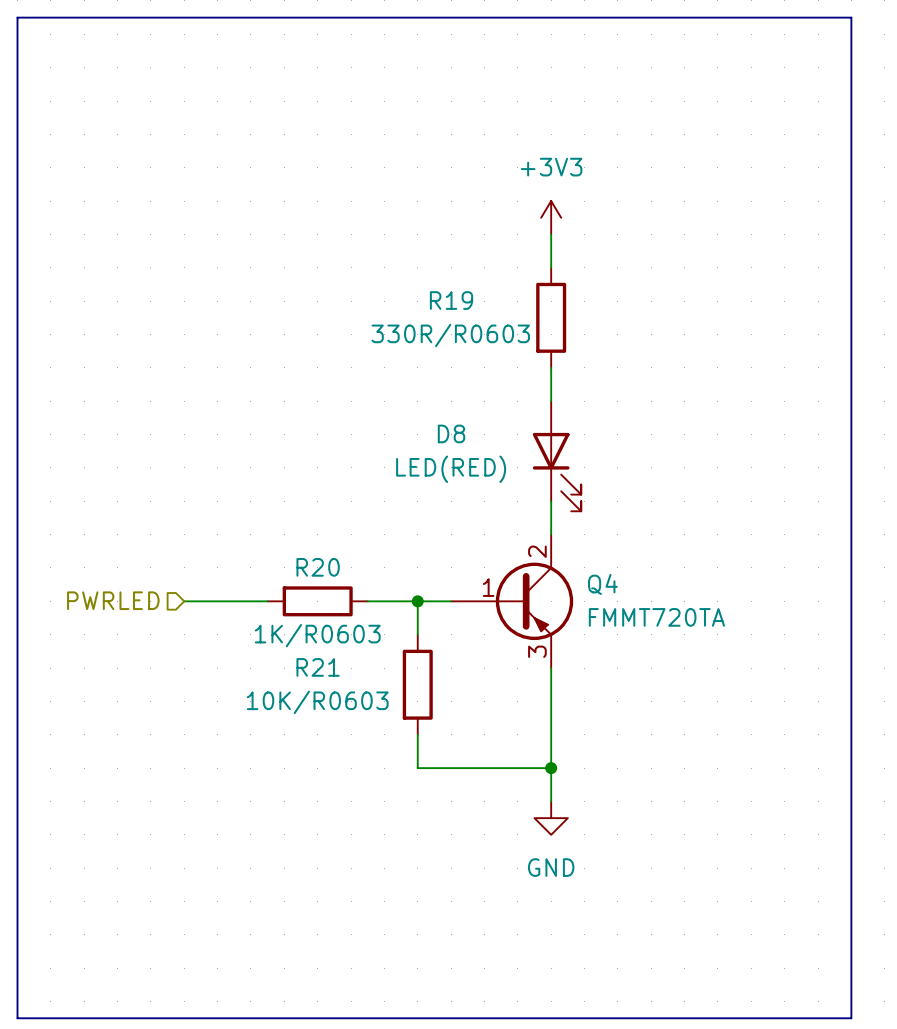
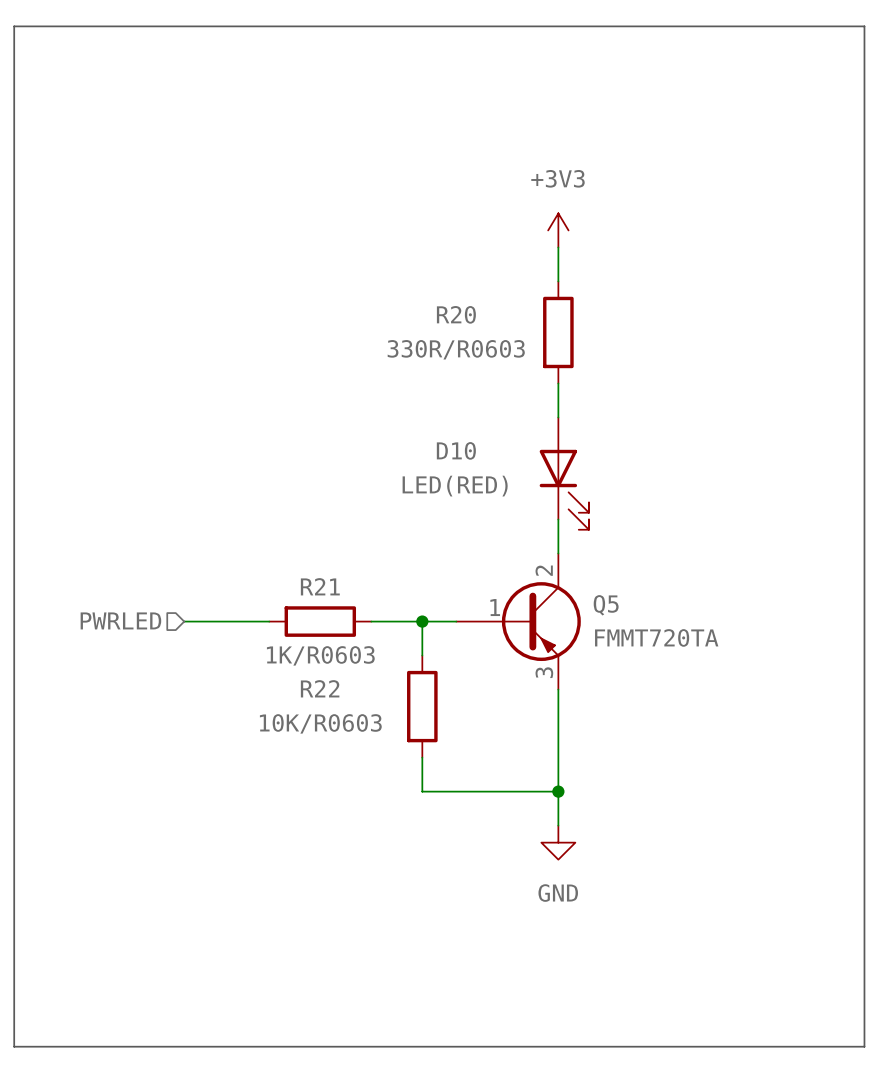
R19 name: R19 (451, 300) -> R20 (456, 314)
D8 name: D8 (451, 433) -> D10 (456, 450)
R20 name: R20 (318, 567) -> R21 (320, 586)
Q4 name: Q4 (602, 584) -> Q5 (606, 605)
R21 name: R21 (318, 667) -> R22 (320, 688)

